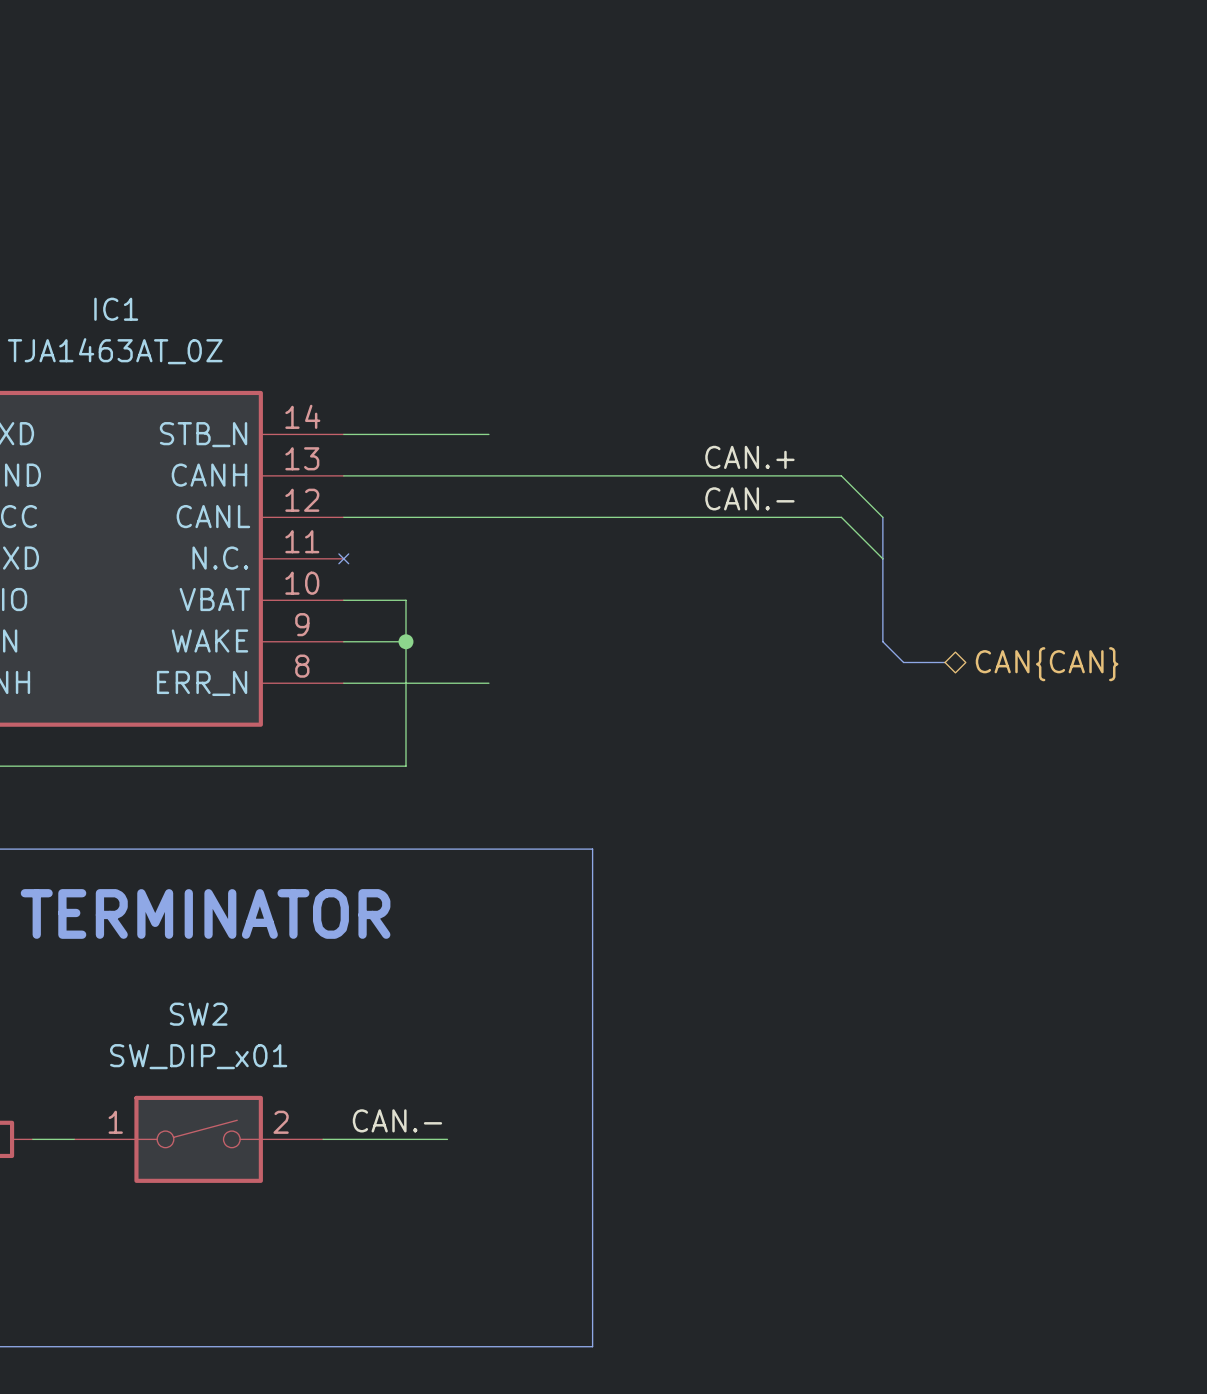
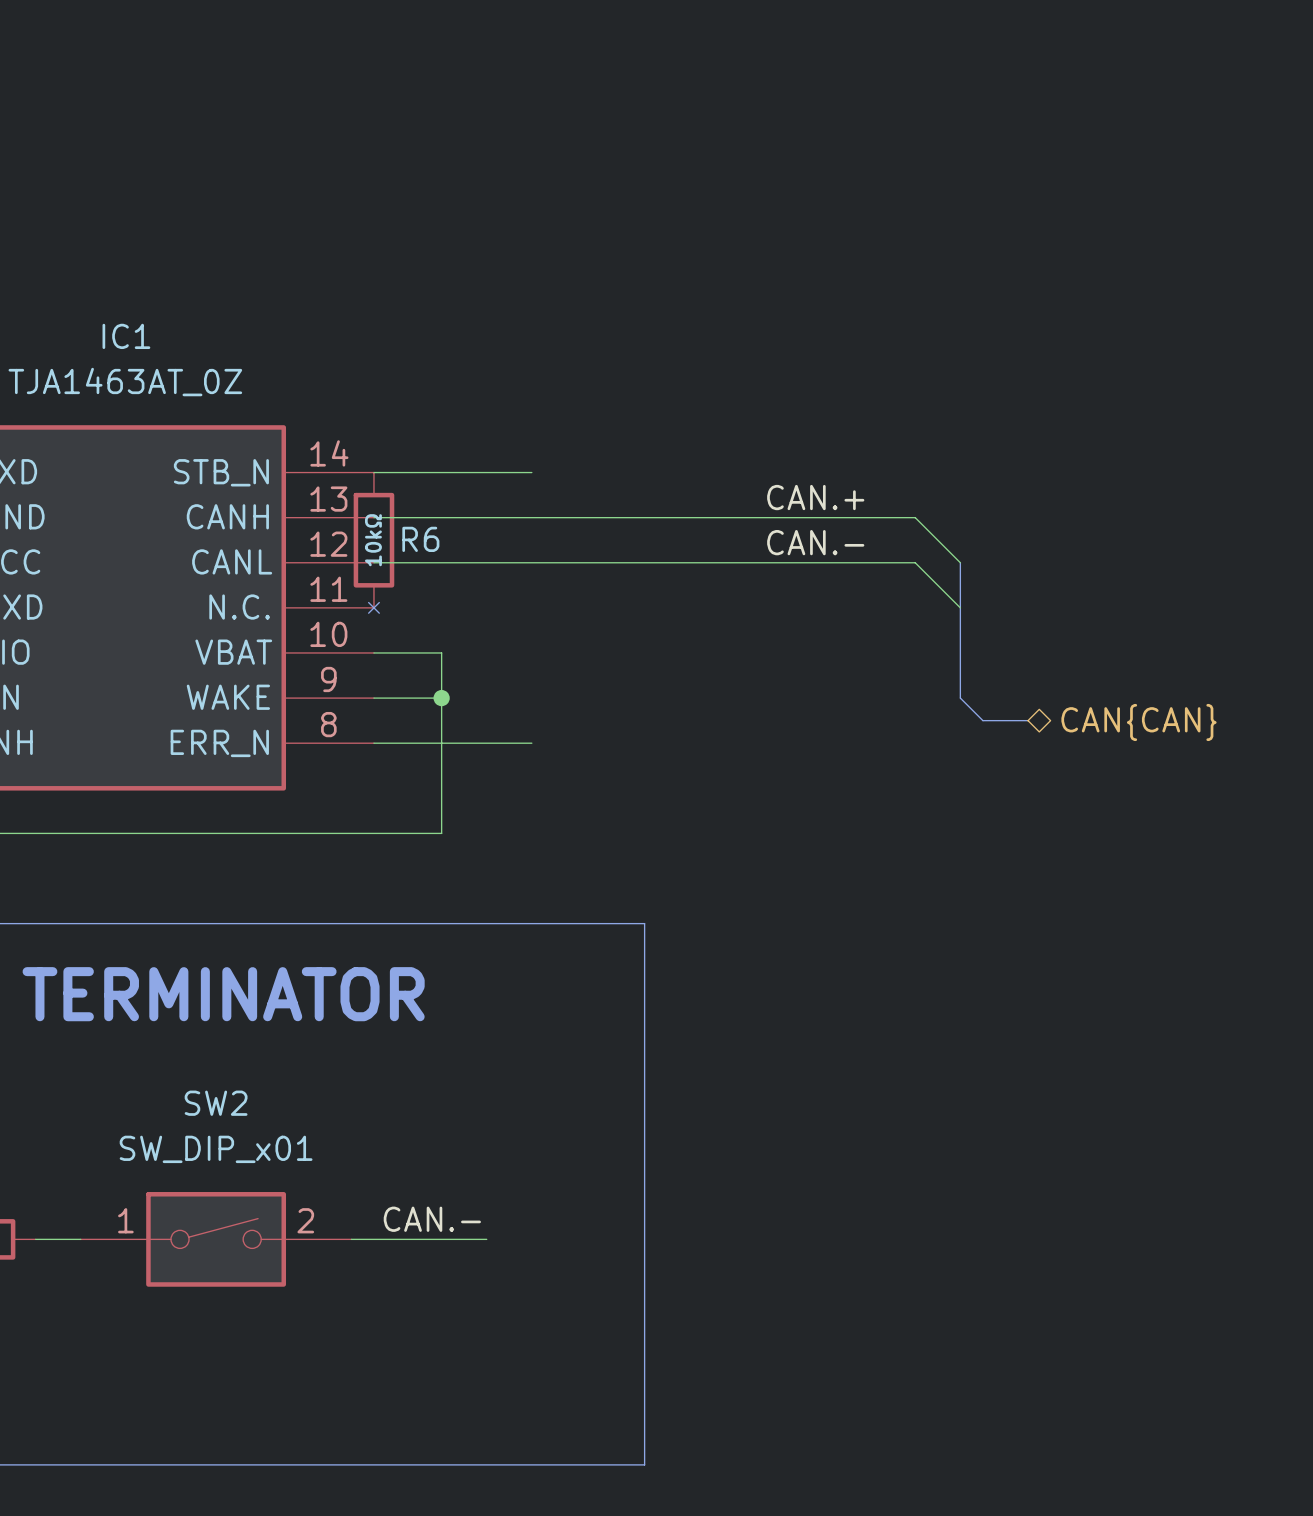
R6: none -> 10kΩ (373, 540)

